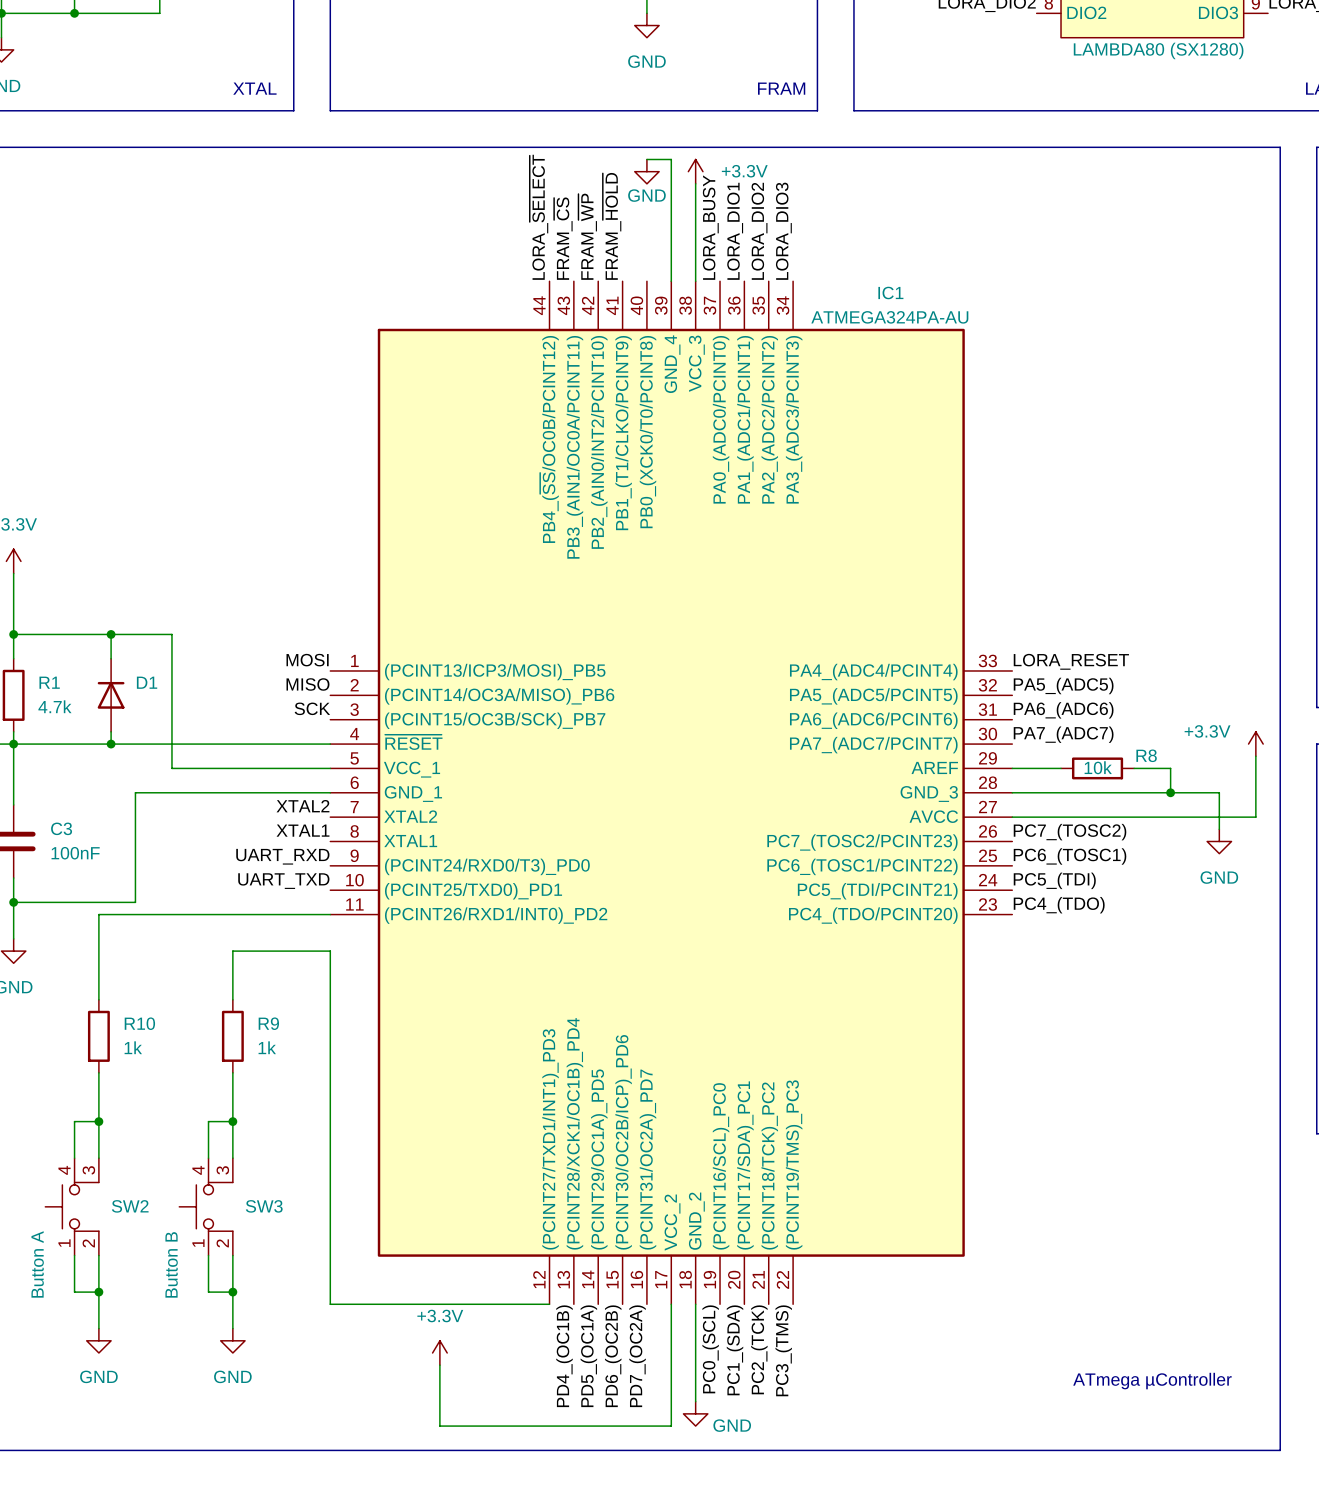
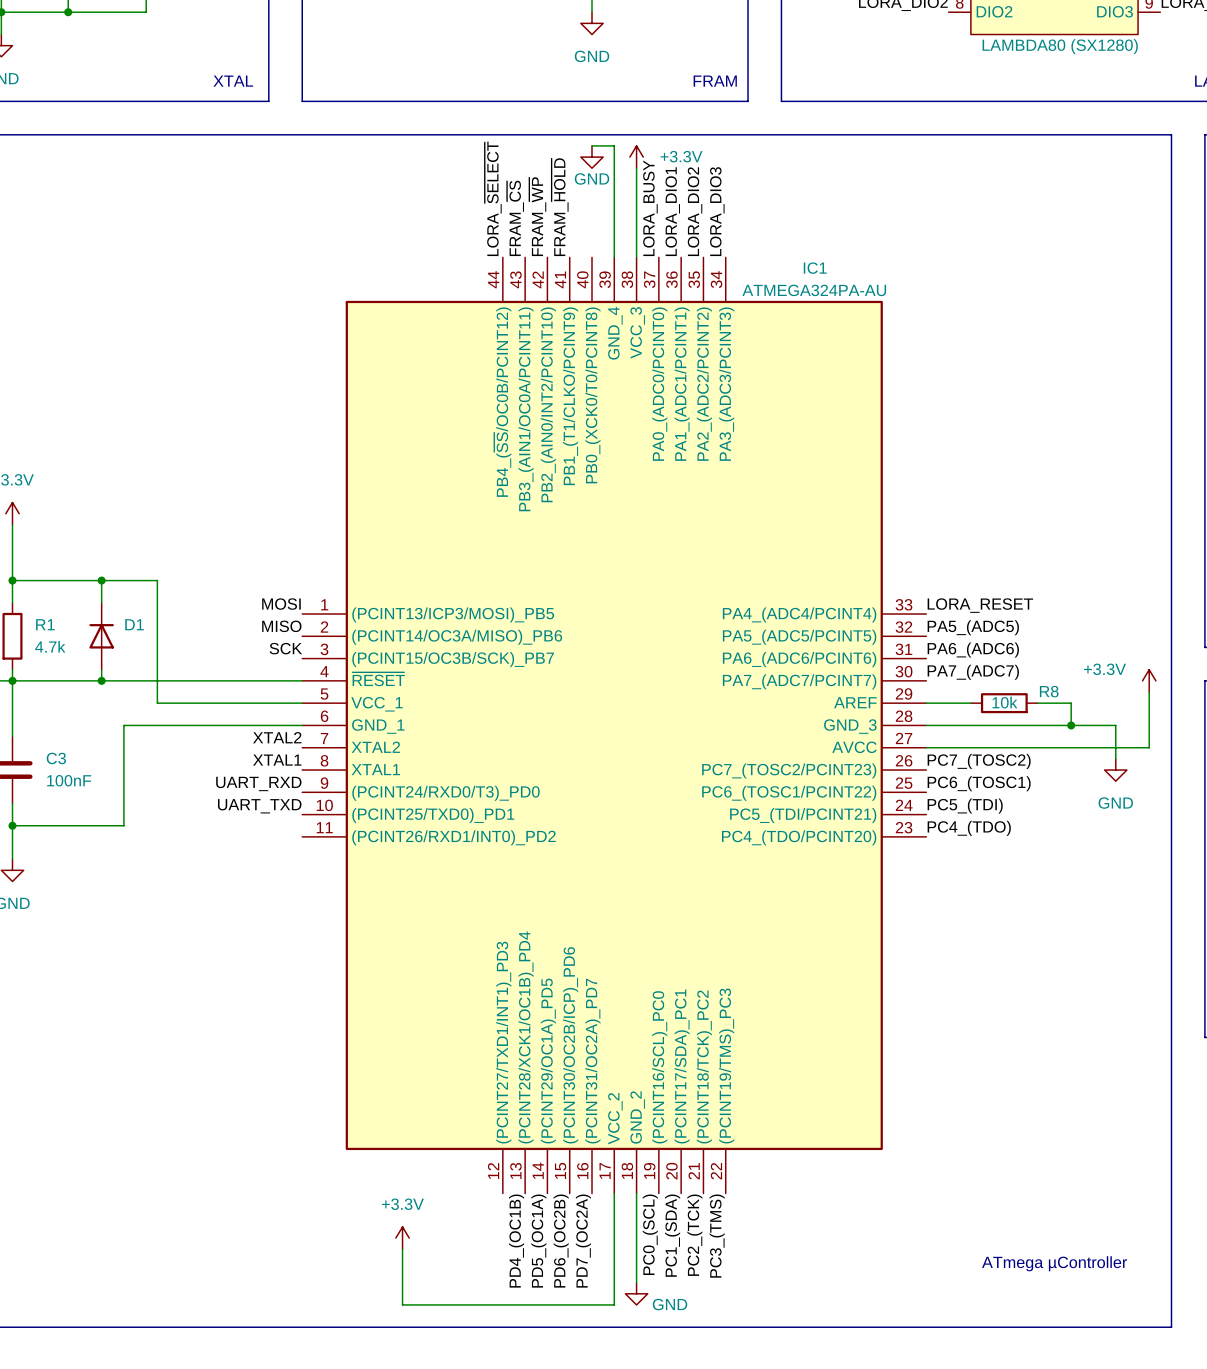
wire: (330, 914) (98, 914) (98, 999) -> none
wire: (232, 999) (232, 951) (330, 951) (330, 1304) (549, 1304) -> none
R10: 1k (98, 1036) -> none
R9: 1k (232, 1036) -> none
wire: (98, 1072) (98, 1158) -> none
wire: (232, 1072) (232, 1158) -> none
wire: (98, 1121) (74, 1121) (74, 1158) -> none
junction: (98, 1121) -> none
wire: (232, 1121) (208, 1121) (208, 1158) -> none
junction: (232, 1121) -> none
SW2: Button A (72, 1206) -> none
SW3: Button B (206, 1206) -> none
wire: (74, 1255) (74, 1292) (98, 1292) -> none
wire: (98, 1255) (98, 1328) -> none
wire: (208, 1255) (208, 1292) (232, 1292) -> none
wire: (232, 1255) (232, 1328) -> none
junction: (98, 1292) -> none
junction: (232, 1292) -> none
power symbol: GND (98, 1340) -> none
power symbol: GND (232, 1340) -> none

